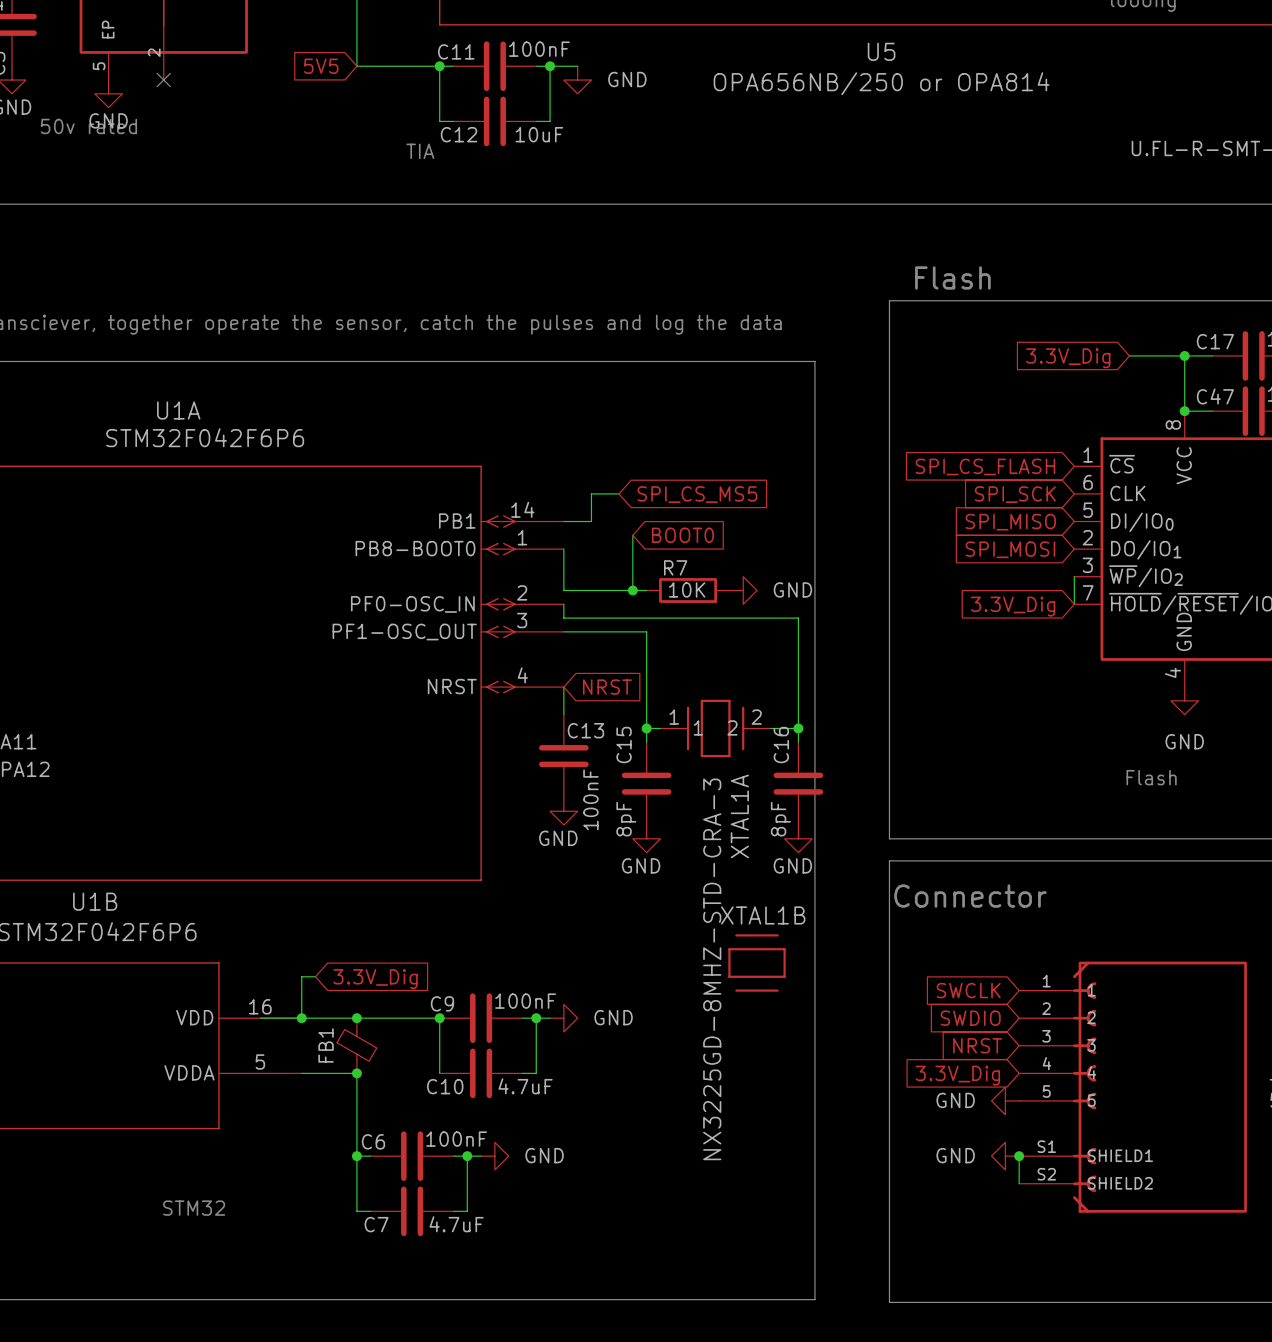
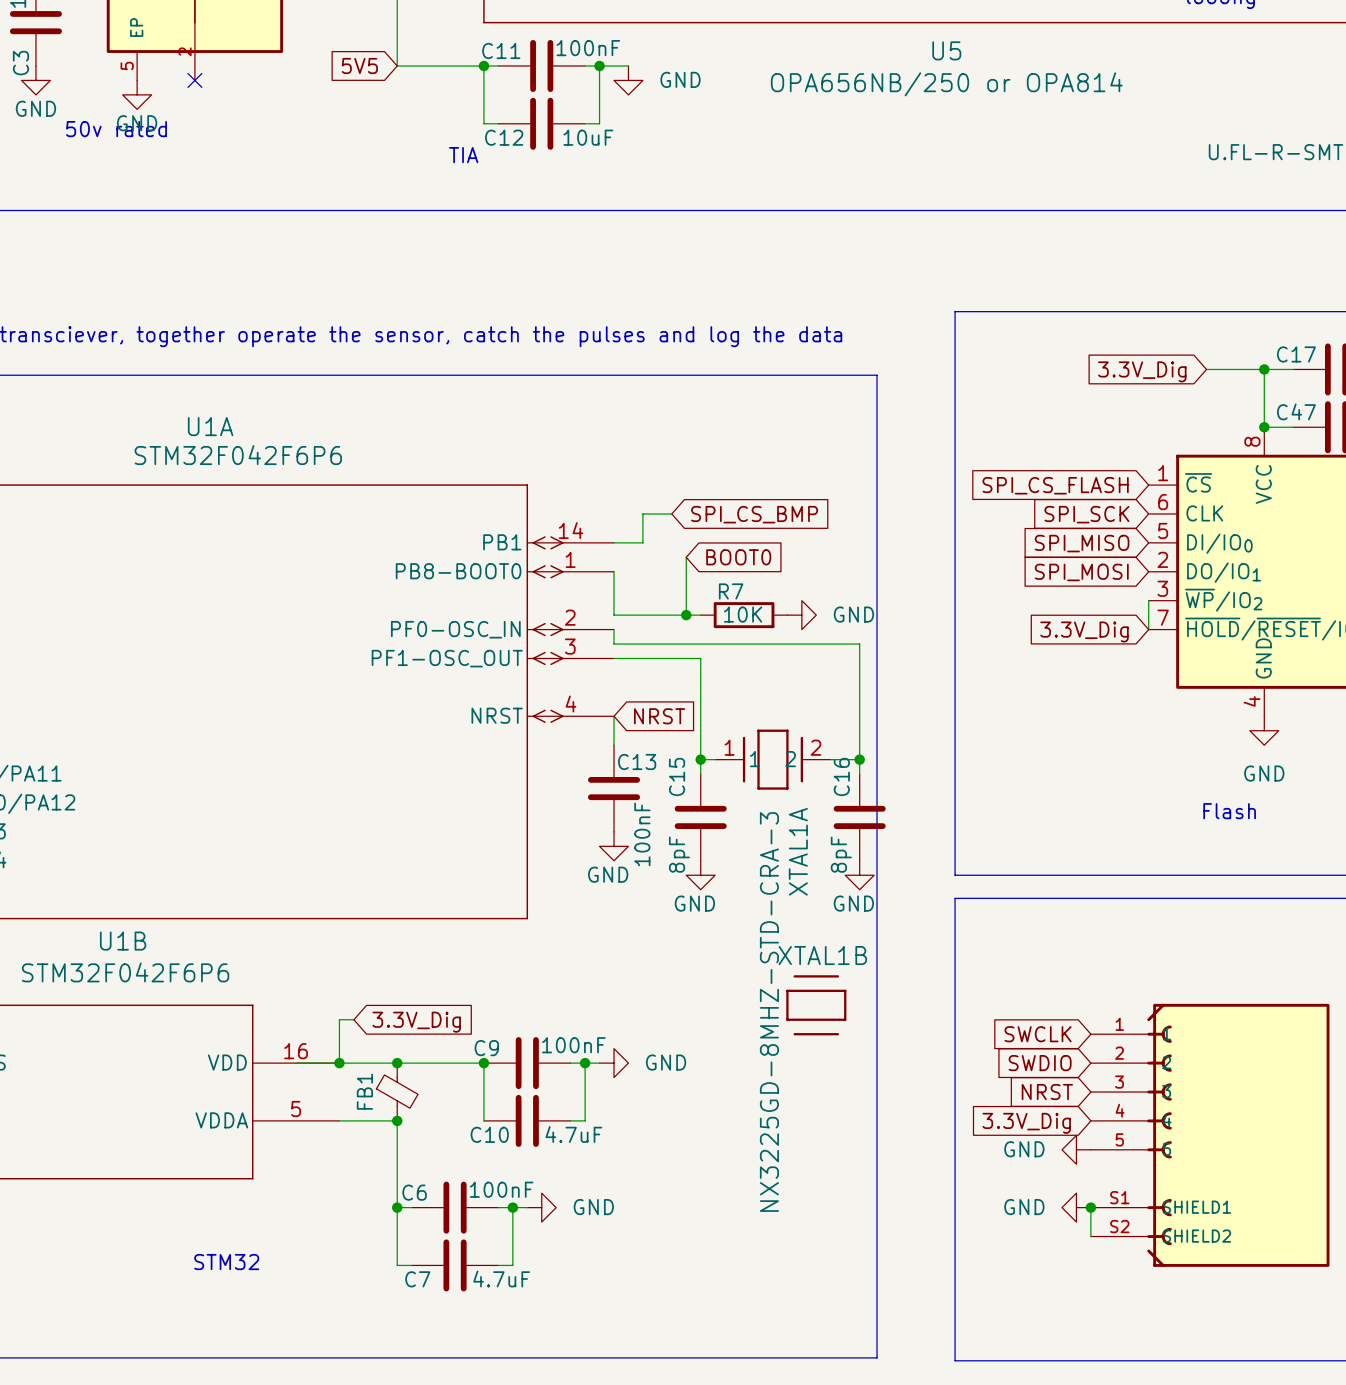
text: Flash (952, 277) -> none
global label: SPI_CS_MS5 (697, 494) -> SPI_CS_BMP (754, 514)
text: Connector (970, 896) -> none

